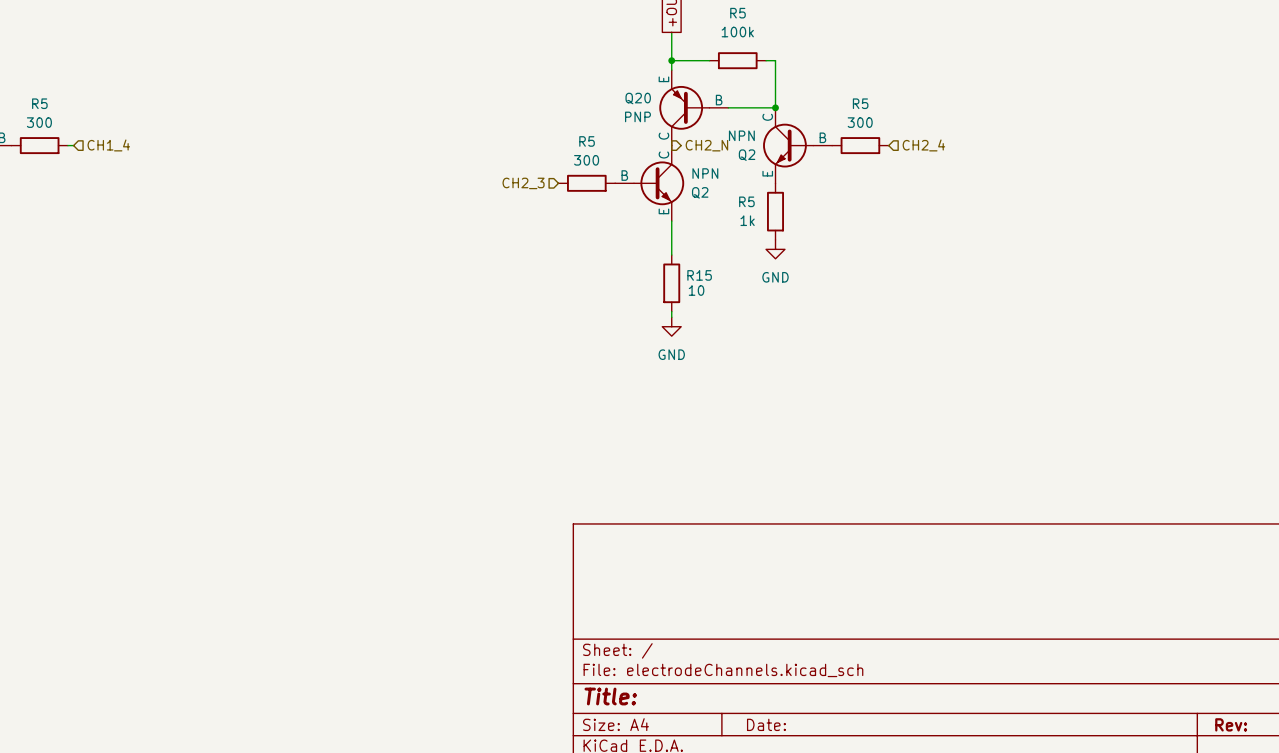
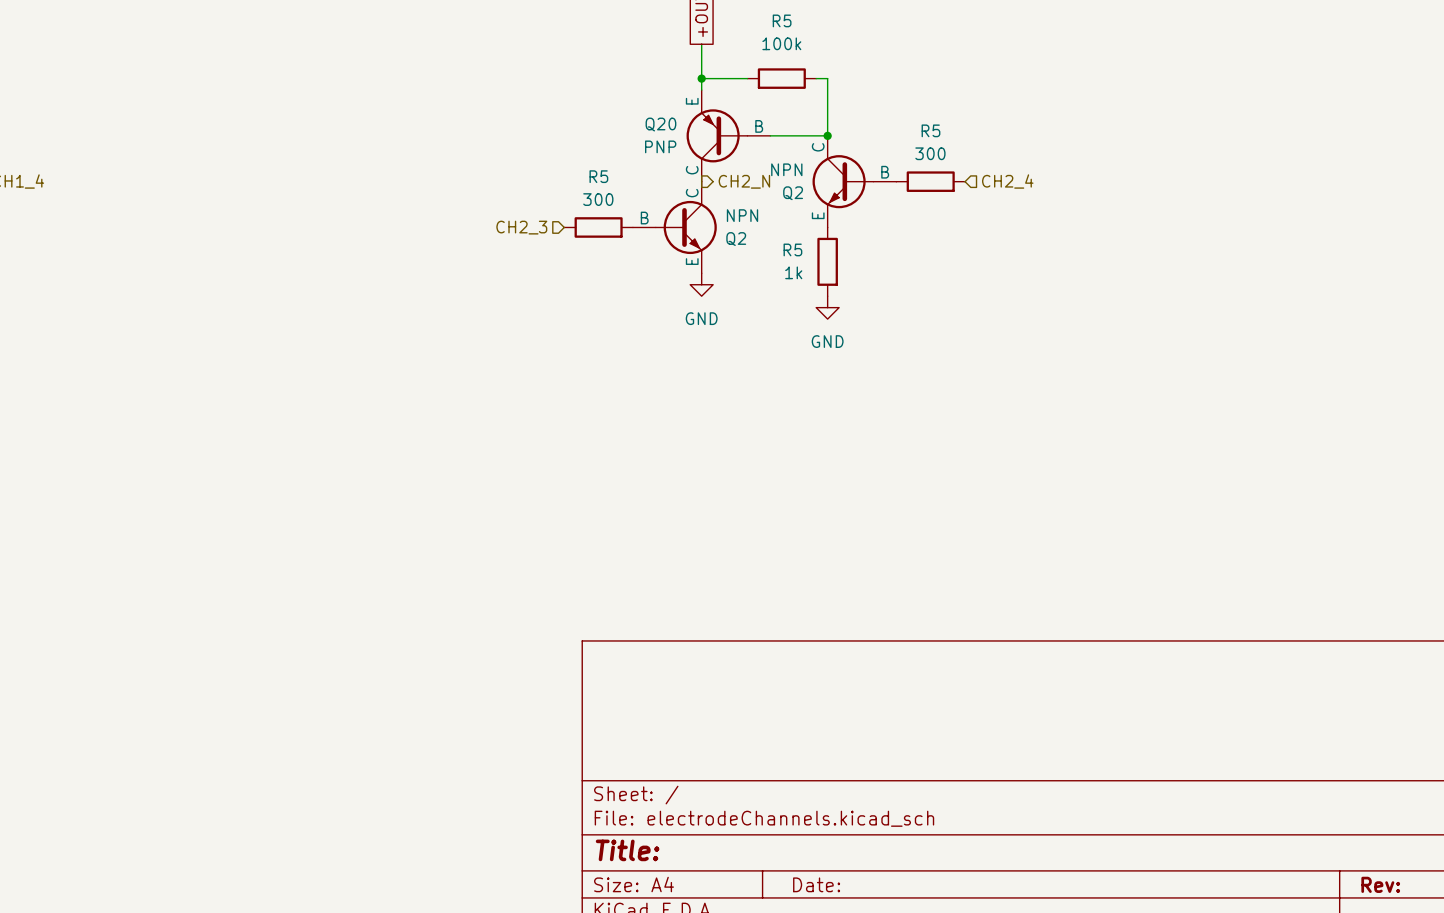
wire: (671, 221) (671, 255) -> none
R15: 10 (671, 283) -> none
wire: (671, 311) (671, 317) -> none
power symbol position: GND (671, 326) -> GND (701, 284)

